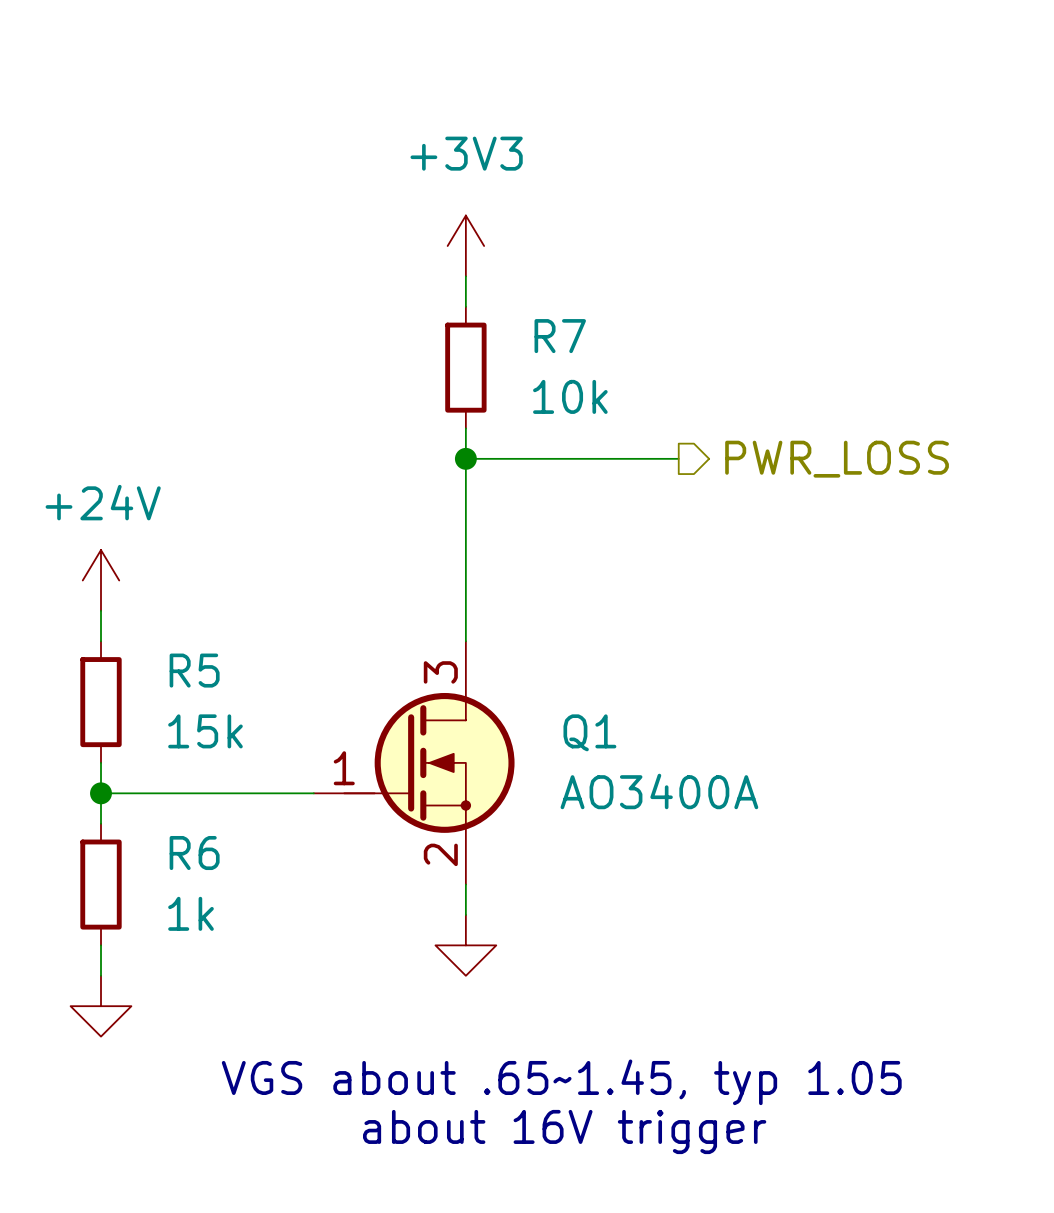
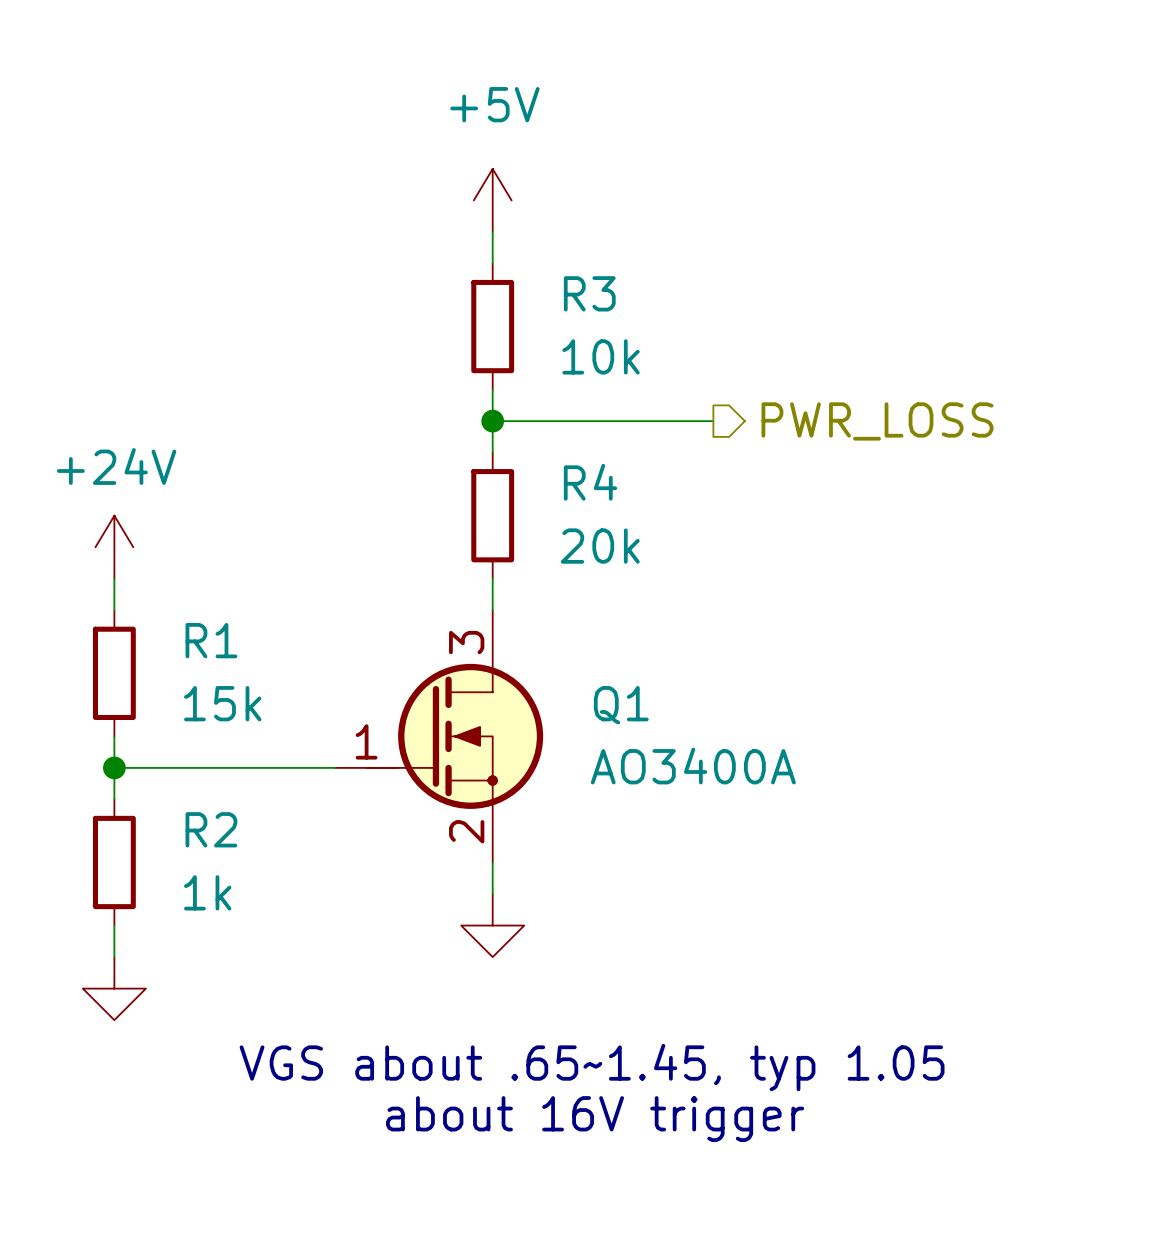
power symbol: +3V3 (465, 246) -> +5V (492, 200)
R7 name: R7 (560, 336) -> R3 (589, 293)
wire: (465, 489) (465, 610) -> none
R4: none -> 20k (492, 515)
R5 name: R5 (194, 670) -> R1 (211, 640)
R6 name: R6 (194, 853) -> R2 (211, 829)

